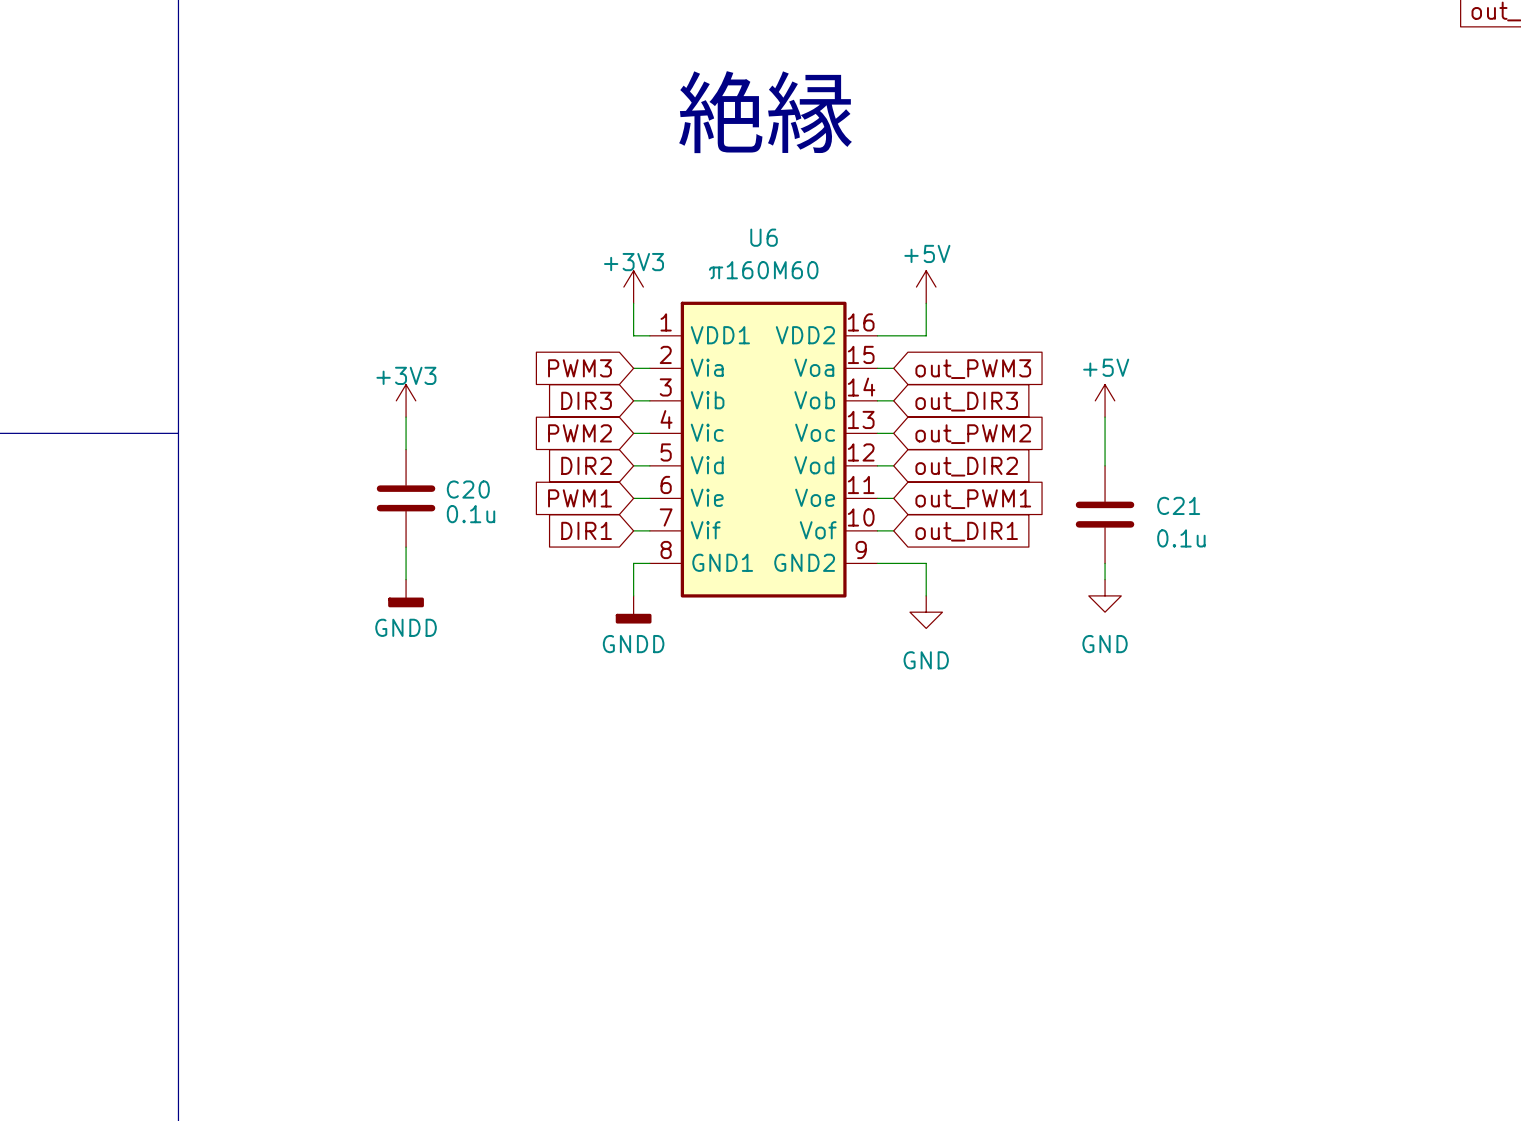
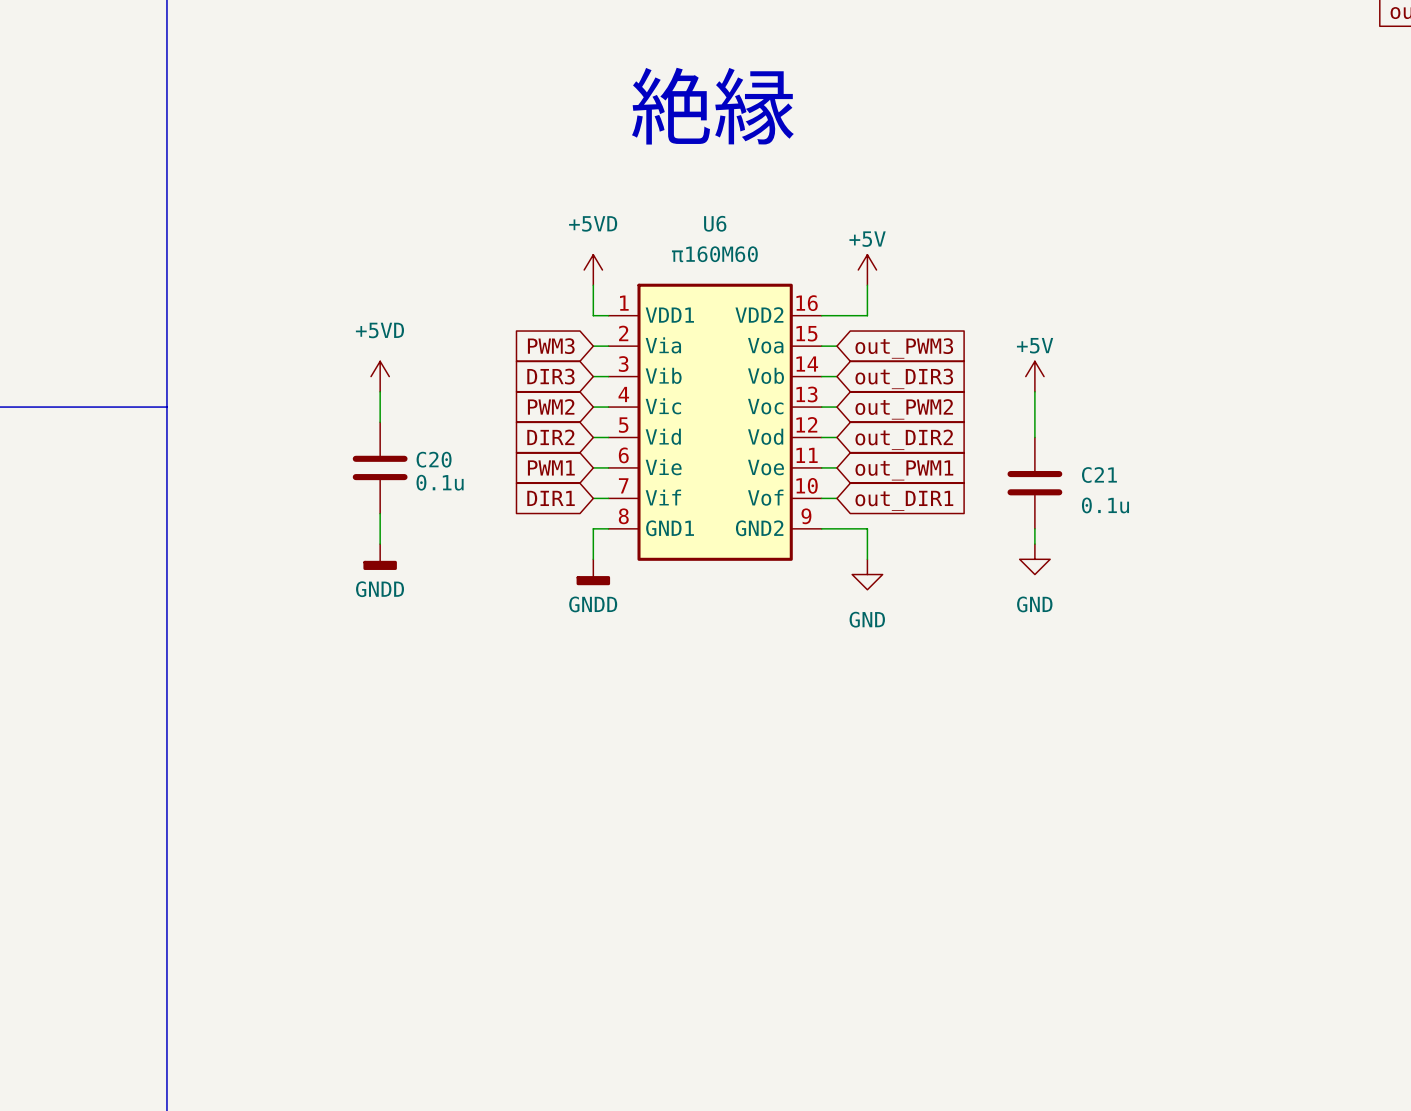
power symbol: +3V3 (633, 287) -> +5VD (593, 270)
power symbol: +3V3 (406, 400) -> +5VD (380, 376)

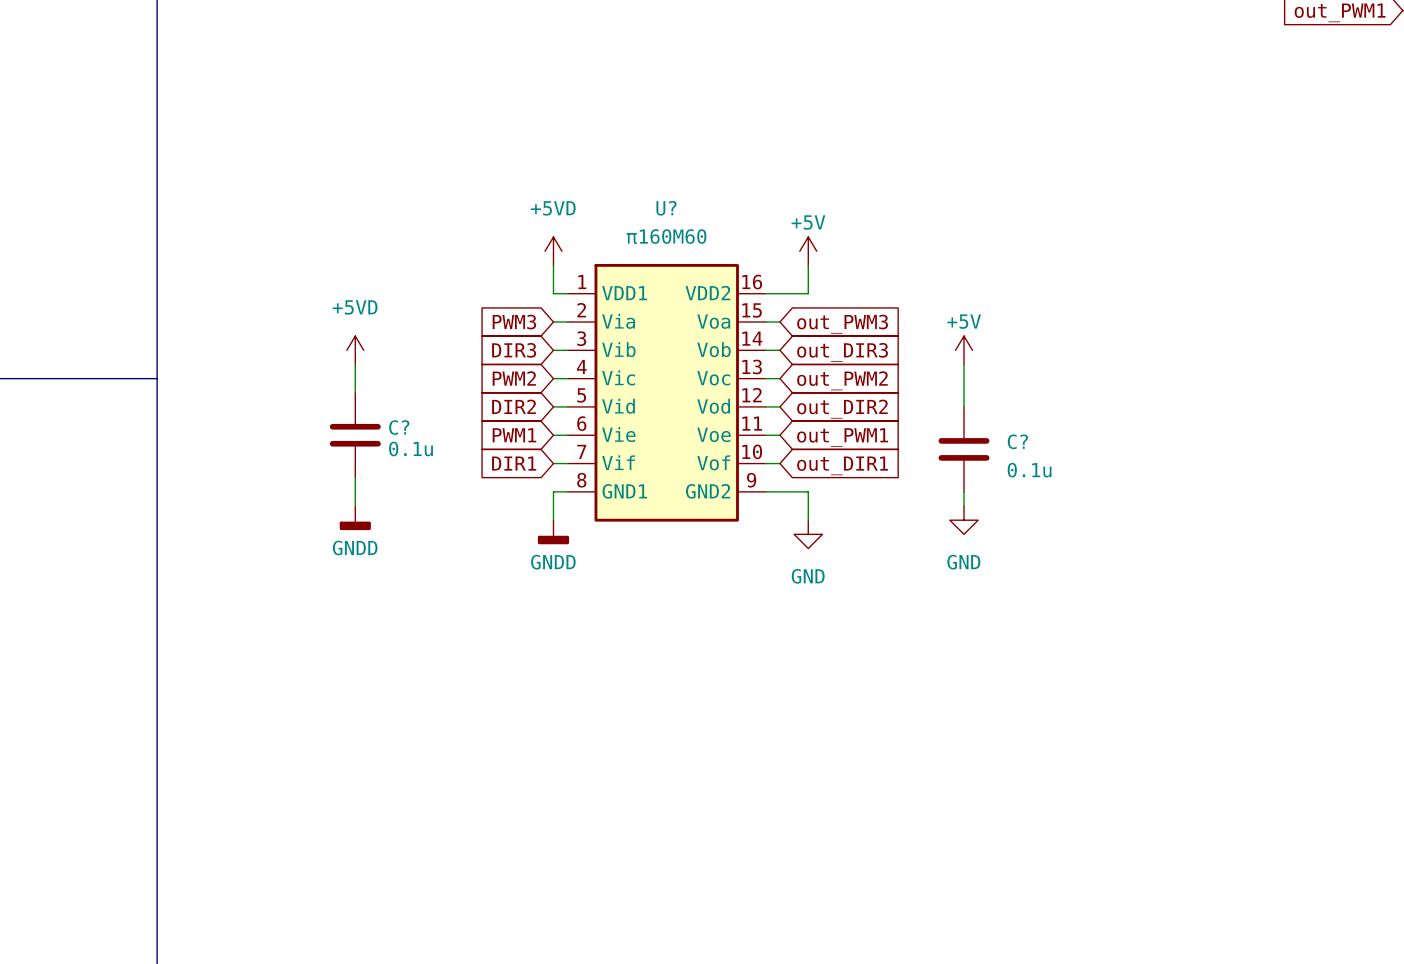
text: 絶縁 (712, 106) -> none
U6 name: U6 (715, 223) -> U? (666, 208)
C20 name: C20 (434, 459) -> C? (399, 427)
C21 name: C21 (1099, 475) -> C? (1017, 441)

